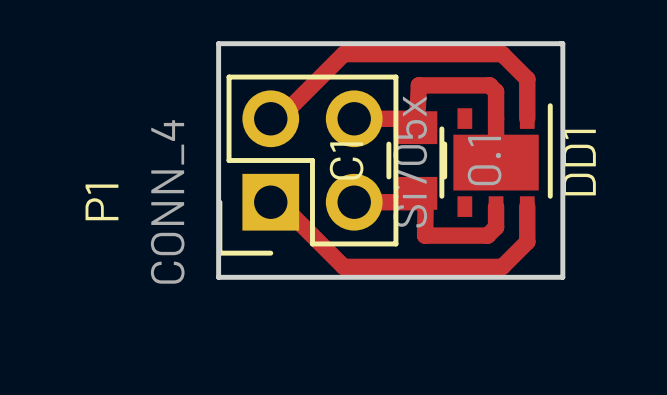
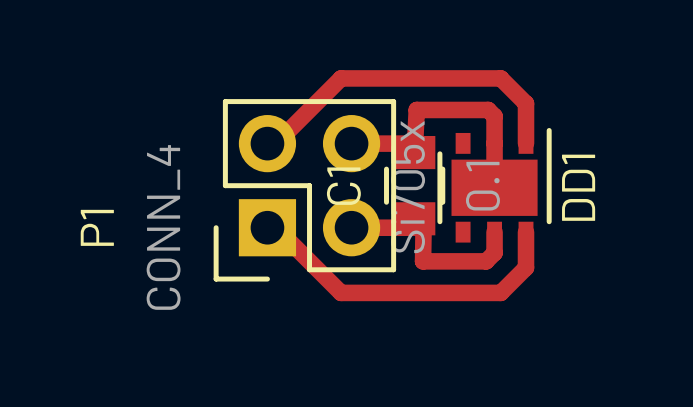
board edge: (218, 43) (562, 43) (562, 277) (218, 277) (218, 43) -> none

